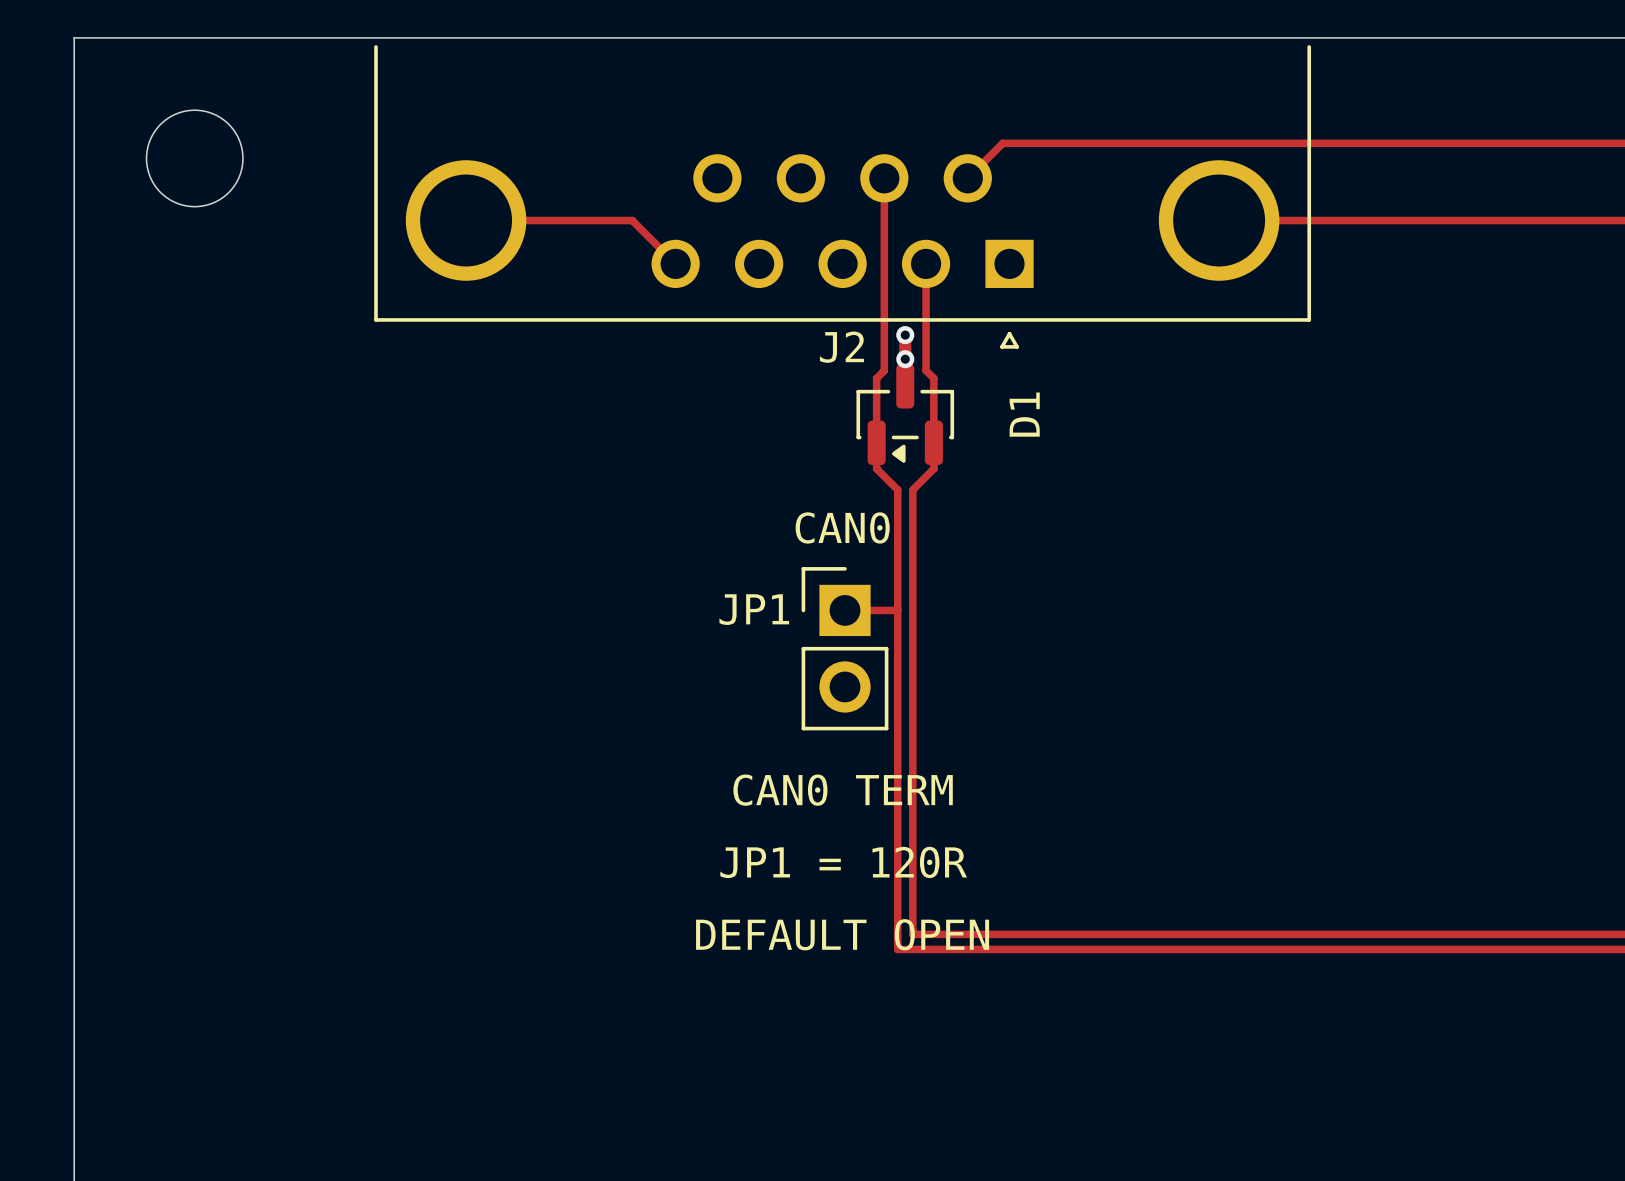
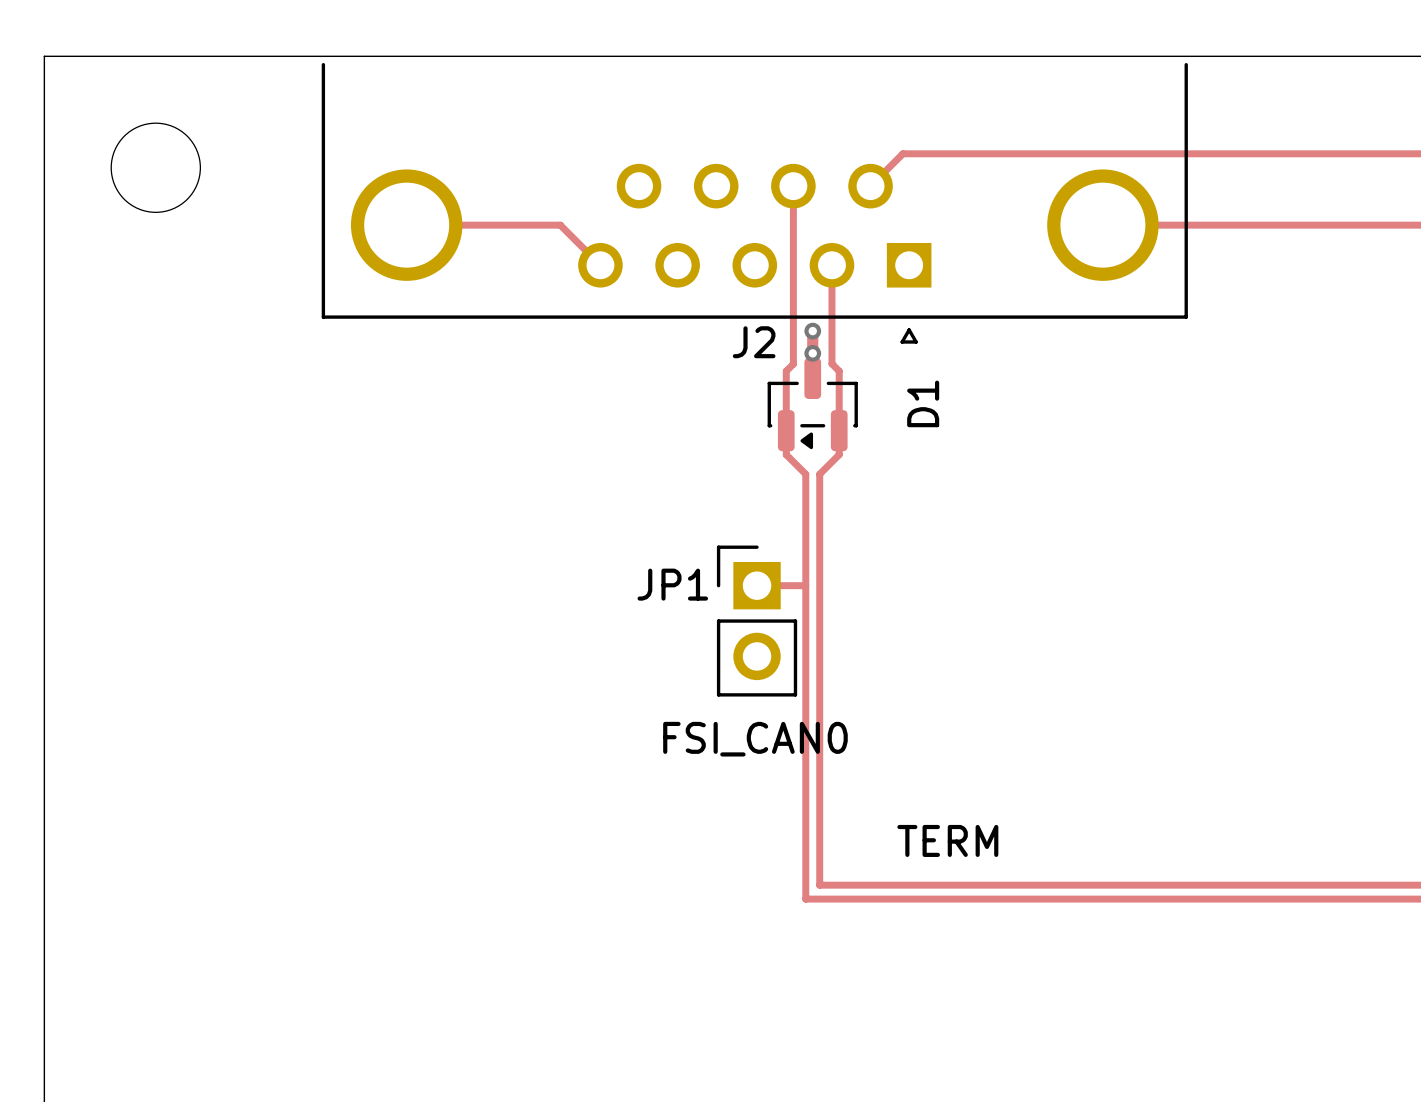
text: CAN0 (842, 527) -> none
text: CAN0 TERM (843, 790) -> FSI_CAN0 (755, 739)
text: JP1 = 120R (843, 862) -> none
text: none -> TERM (947, 840)
text: DEFAULT OPEN (842, 934) -> none

